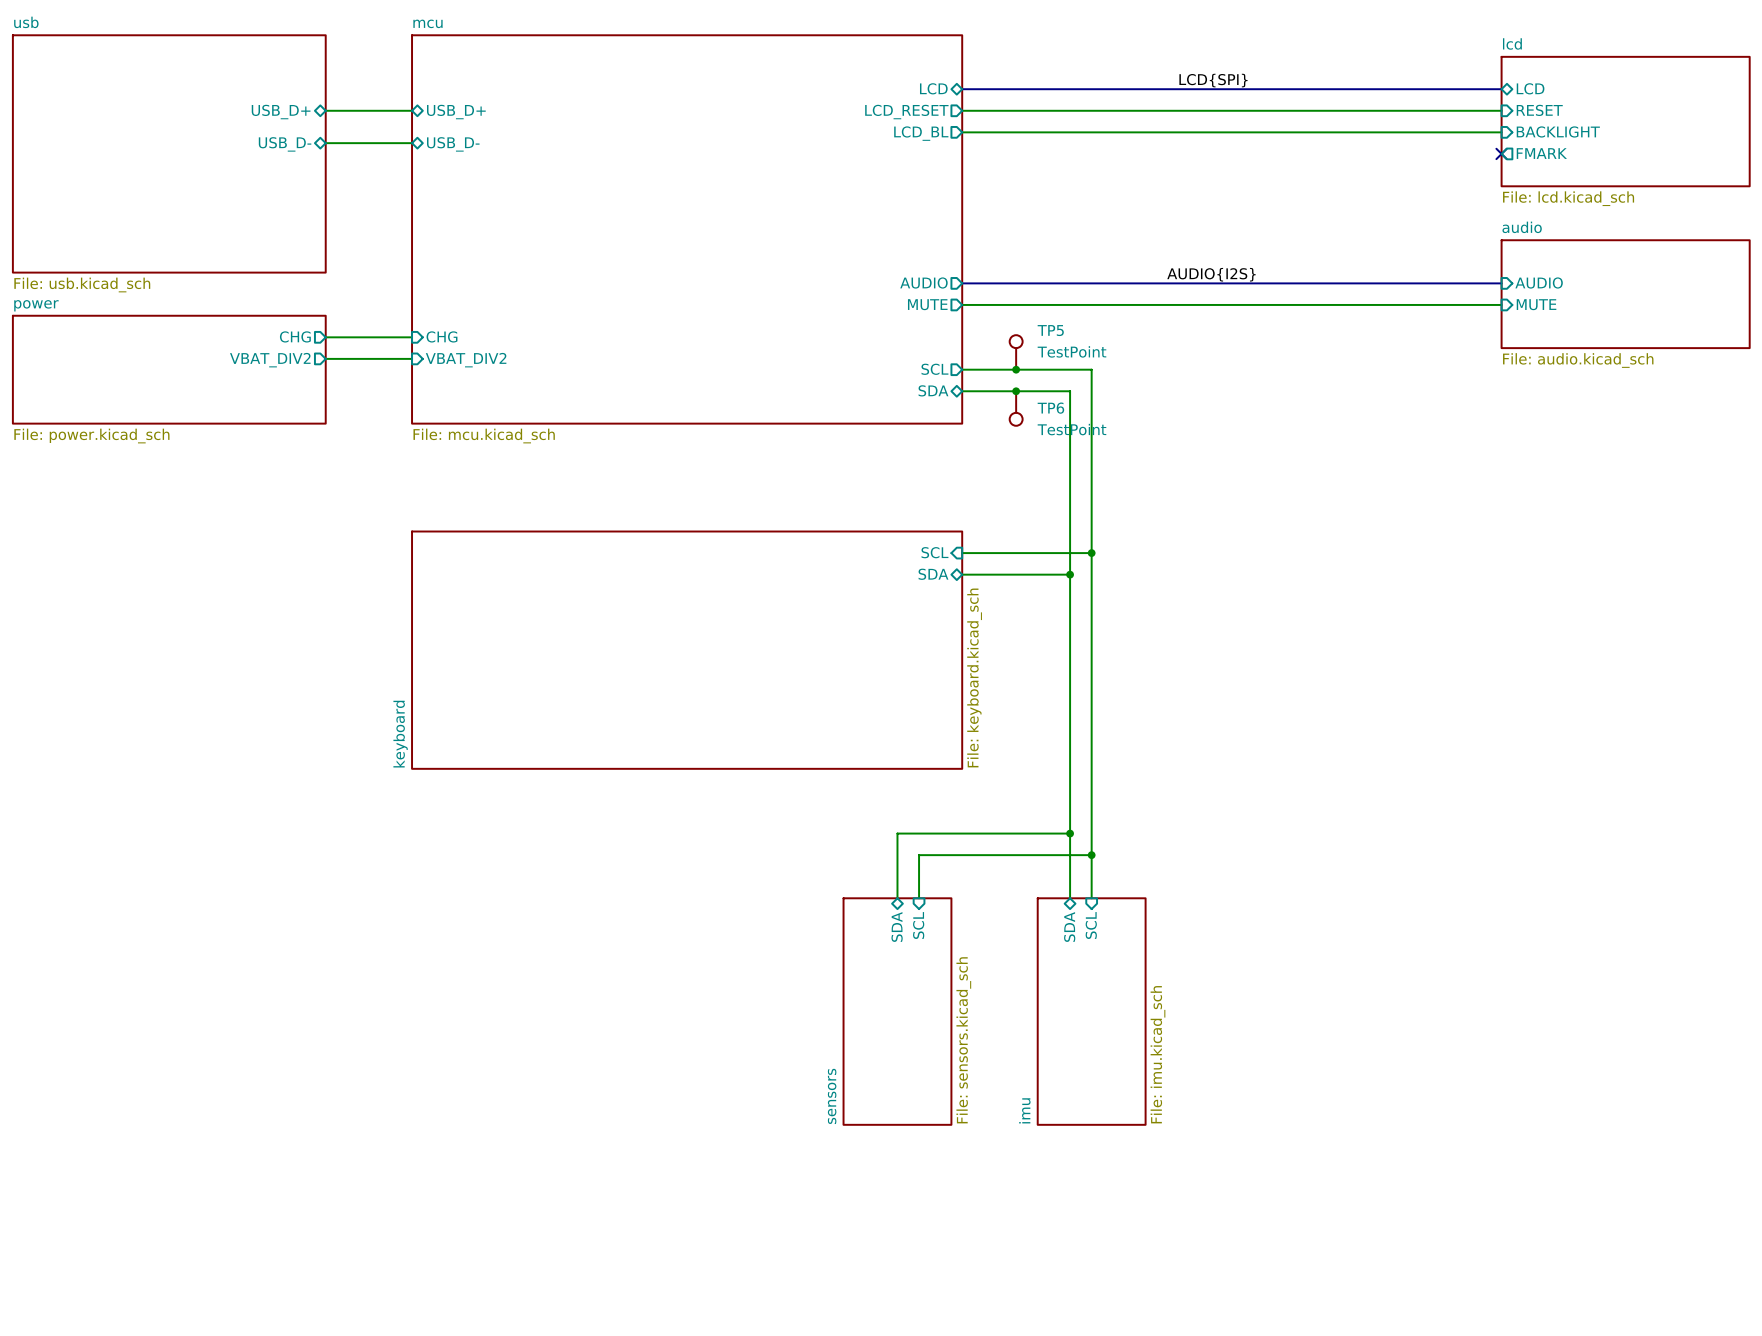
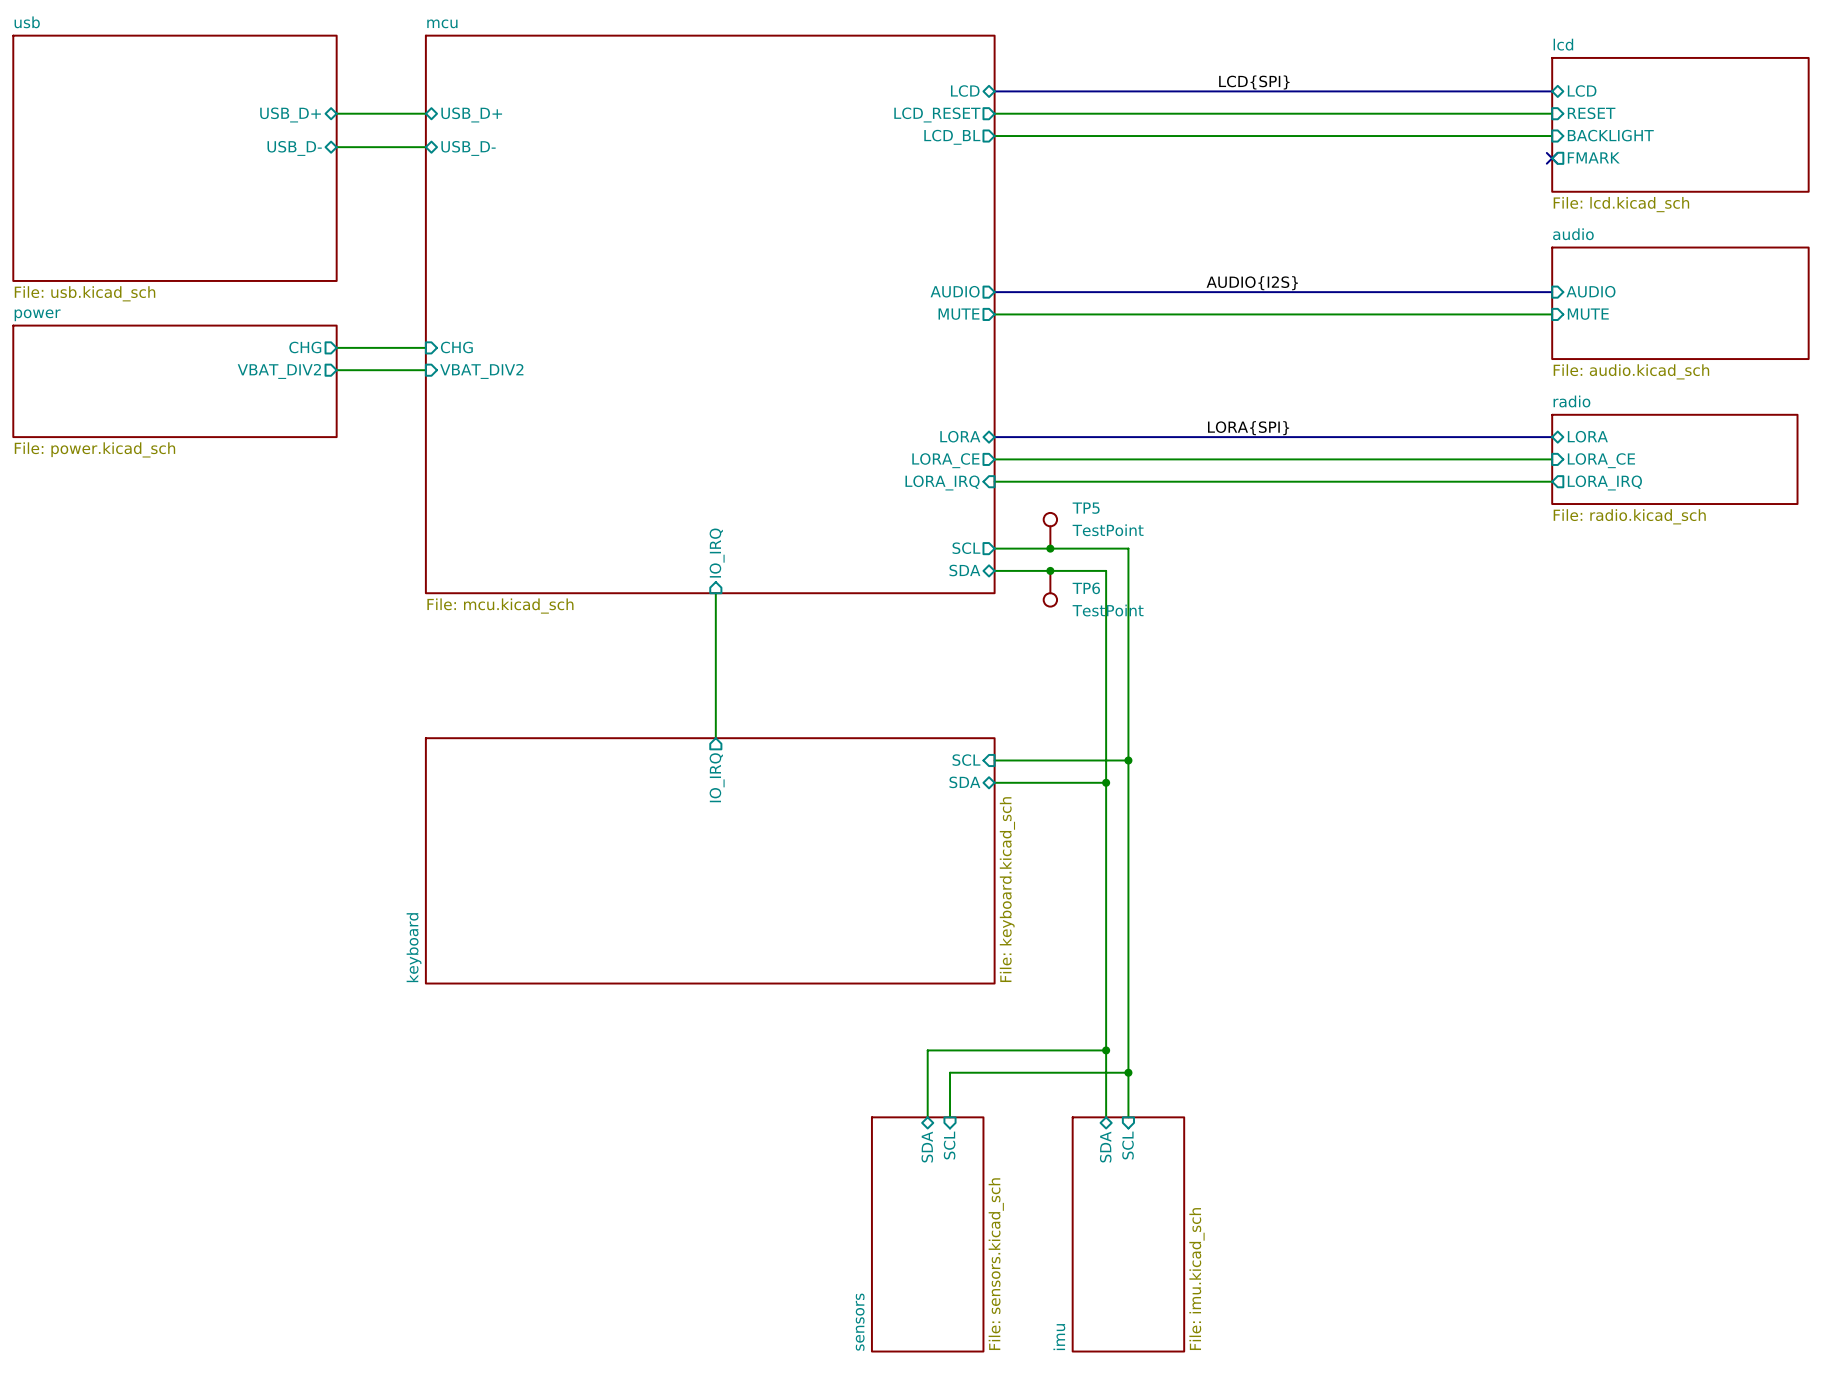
sheet mcu: File: mcu.kicad_sch (687, 229) -> none
sheet mcu: none -> File: mcu.kicad_sch (710, 314)
TP5 position: (1016, 352) -> (1050, 530)
sheet pin position: SCL (934, 369) -> SCL (966, 548)
wire: (962, 369) (1091, 369) (1091, 531) -> (994, 548) (1128, 548)
junction: (1016, 369) -> none
sheet pin: SDA (933, 390) -> none
wire: (962, 391) (1070, 391) (1070, 553) (1091, 553) -> none
junction: (1016, 391) -> none
TP6 position: (1016, 408) -> (1050, 588)
label: none -> LORA{SPI} (1248, 428)
sheet pin: none -> LORA (960, 436)
bus: none -> (994, 437) (1552, 437)
sheet pin: none -> LORA (1587, 436)
wire: none -> (994, 459) (1552, 459)
sheet radio: none -> File: radio.kicad_sch (1674, 459)
sheet pin: none -> LORA_CE (945, 460)
sheet pin: none -> LORA_CE (1601, 460)
wire: none -> (994, 481) (1552, 481)
sheet pin: none -> LORA_IRQ (942, 482)
sheet pin: none -> LORA_IRQ (1604, 482)
junction: none -> (1050, 548)
sheet pin: none -> IO_IRQ (717, 553)
sheet pin shape: input (934, 552) -> bidirectional (964, 570)
sheet pin: SCL (934, 552) -> SDA (964, 570)
junction: none -> (1050, 570)
junction: (1091, 553) -> none
wire: none -> (715, 593) (715, 738)
sheet pin: SDA (933, 574) -> none
wire: (962, 574) (1070, 574) -> (994, 782) (1106, 782)
junction: (1070, 574) -> none
sheet keyboard position: (687, 650) -> (710, 860)
sheet pin: none -> SCL (966, 760)
wire: none -> (994, 760) (1128, 760)
junction: none -> (1128, 760)
sheet pin: none -> IO_IRQ (717, 777)
sheet pin: none -> SDA (964, 782)
junction: none -> (1106, 782)
wire: (1070, 833) (897, 833) (897, 898) -> (1106, 1050) (927, 1050) (927, 1117)
junction: (1070, 833) -> none
wire: (1091, 855) (919, 855) (919, 898) -> (1128, 1072) (950, 1072) (950, 1117)
junction: (1091, 855) -> none
wire: none -> (1106, 927) (1106, 1117)
wire: none -> (1128, 927) (1128, 1117)
sheet pin: SCL (918, 925) -> none
sheet pin: SCL (1091, 925) -> none
sheet pin: SDA (897, 927) -> none
sheet pin: SDA (1069, 927) -> none
sheet sensors position: (897, 1011) -> (927, 1234)
sheet imu position: (1091, 1011) -> (1128, 1234)
junction: none -> (1106, 1050)
junction: none -> (1128, 1072)
sheet pin: none -> SCL (949, 1145)
sheet pin: none -> SCL (1128, 1145)
sheet pin: none -> SDA (927, 1147)
sheet pin: none -> SDA (1105, 1147)

